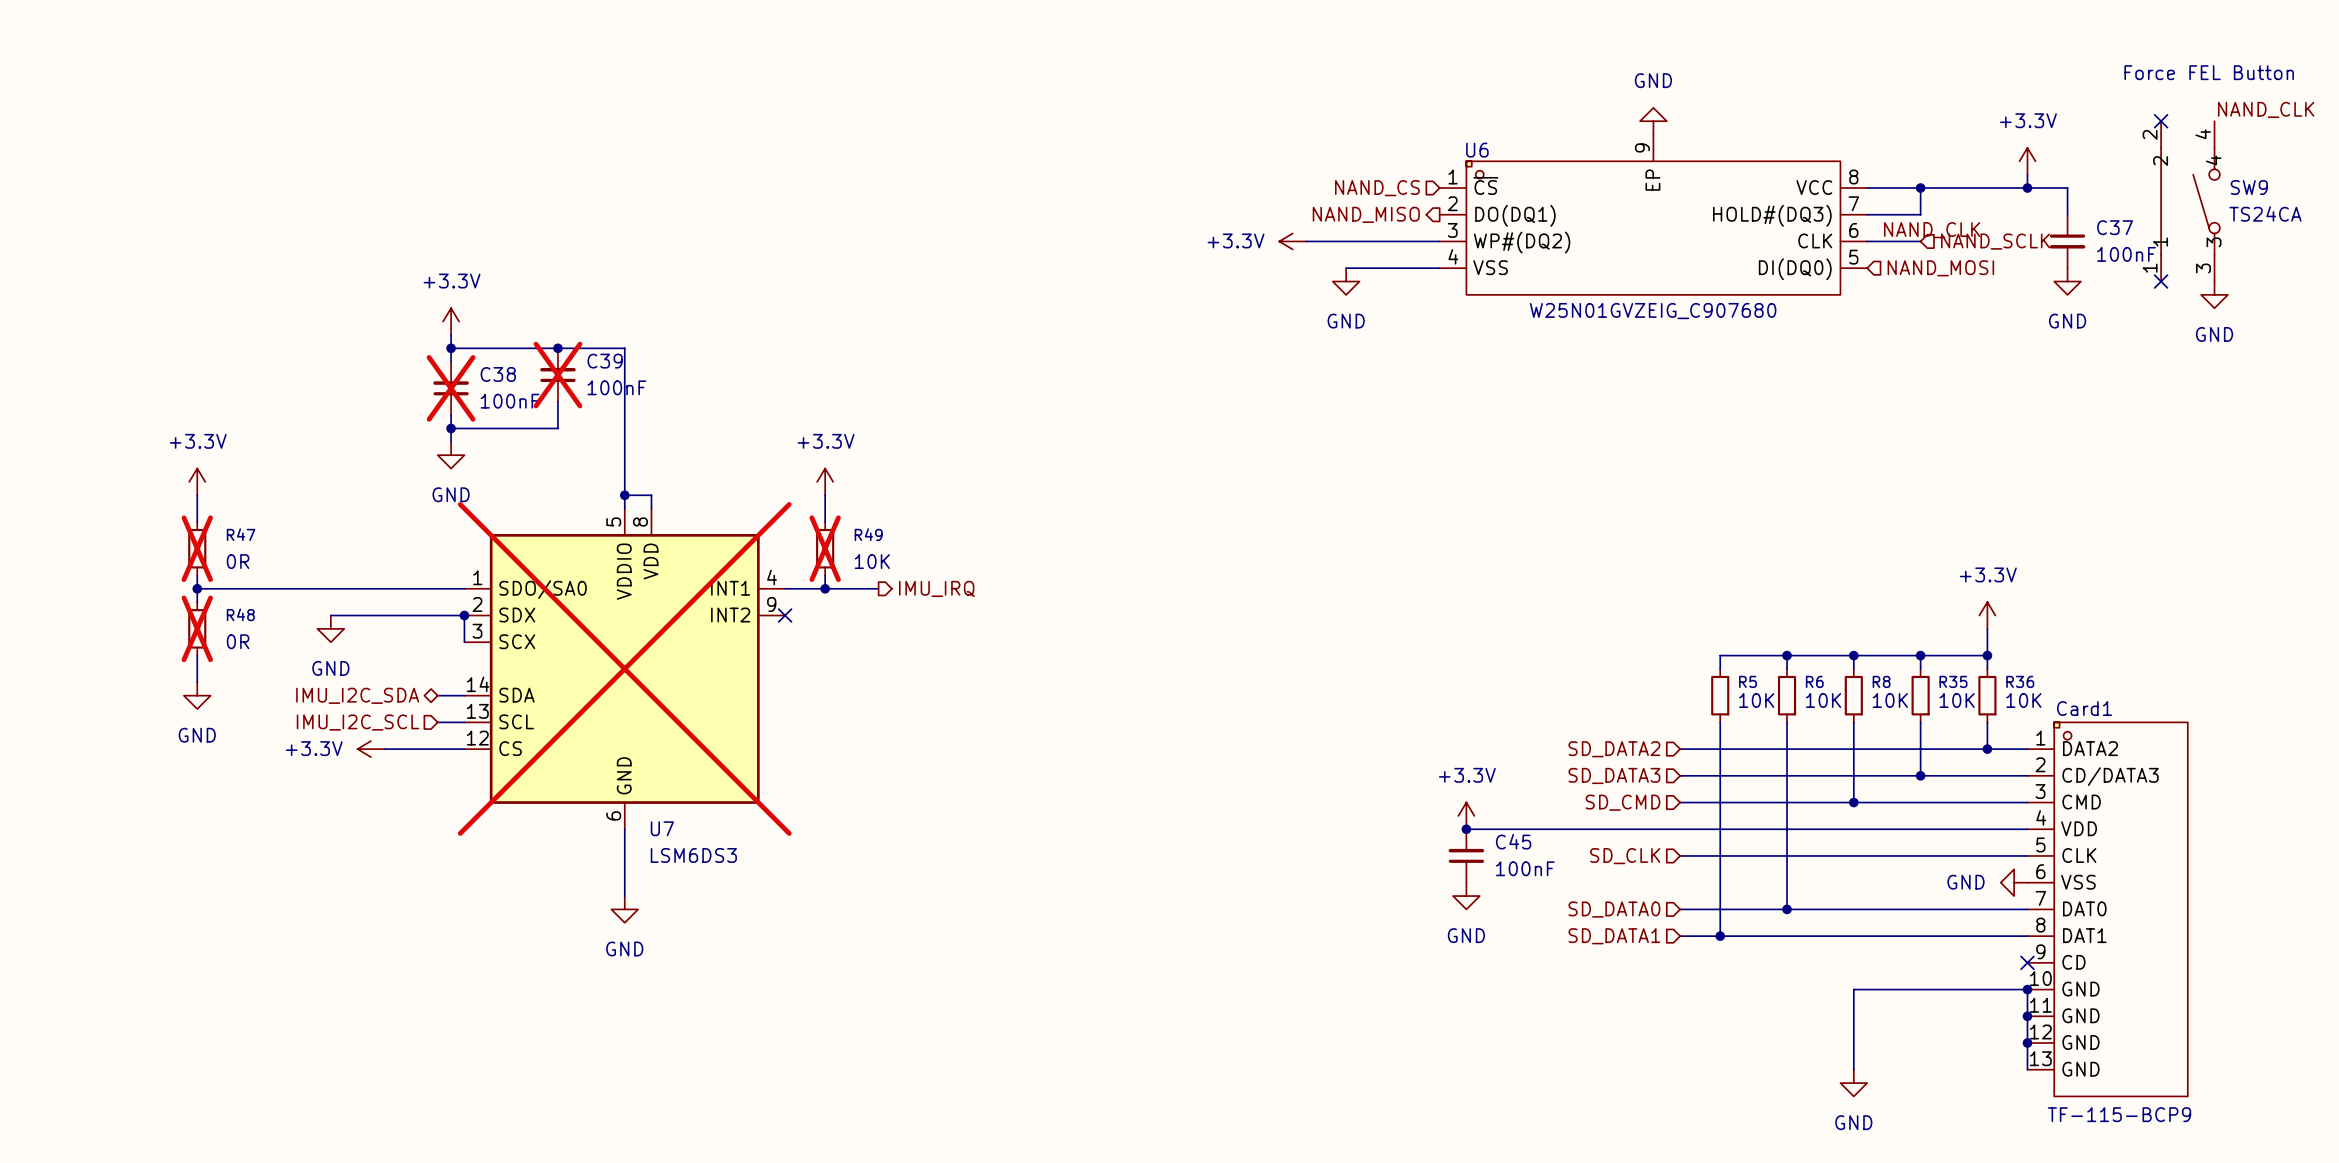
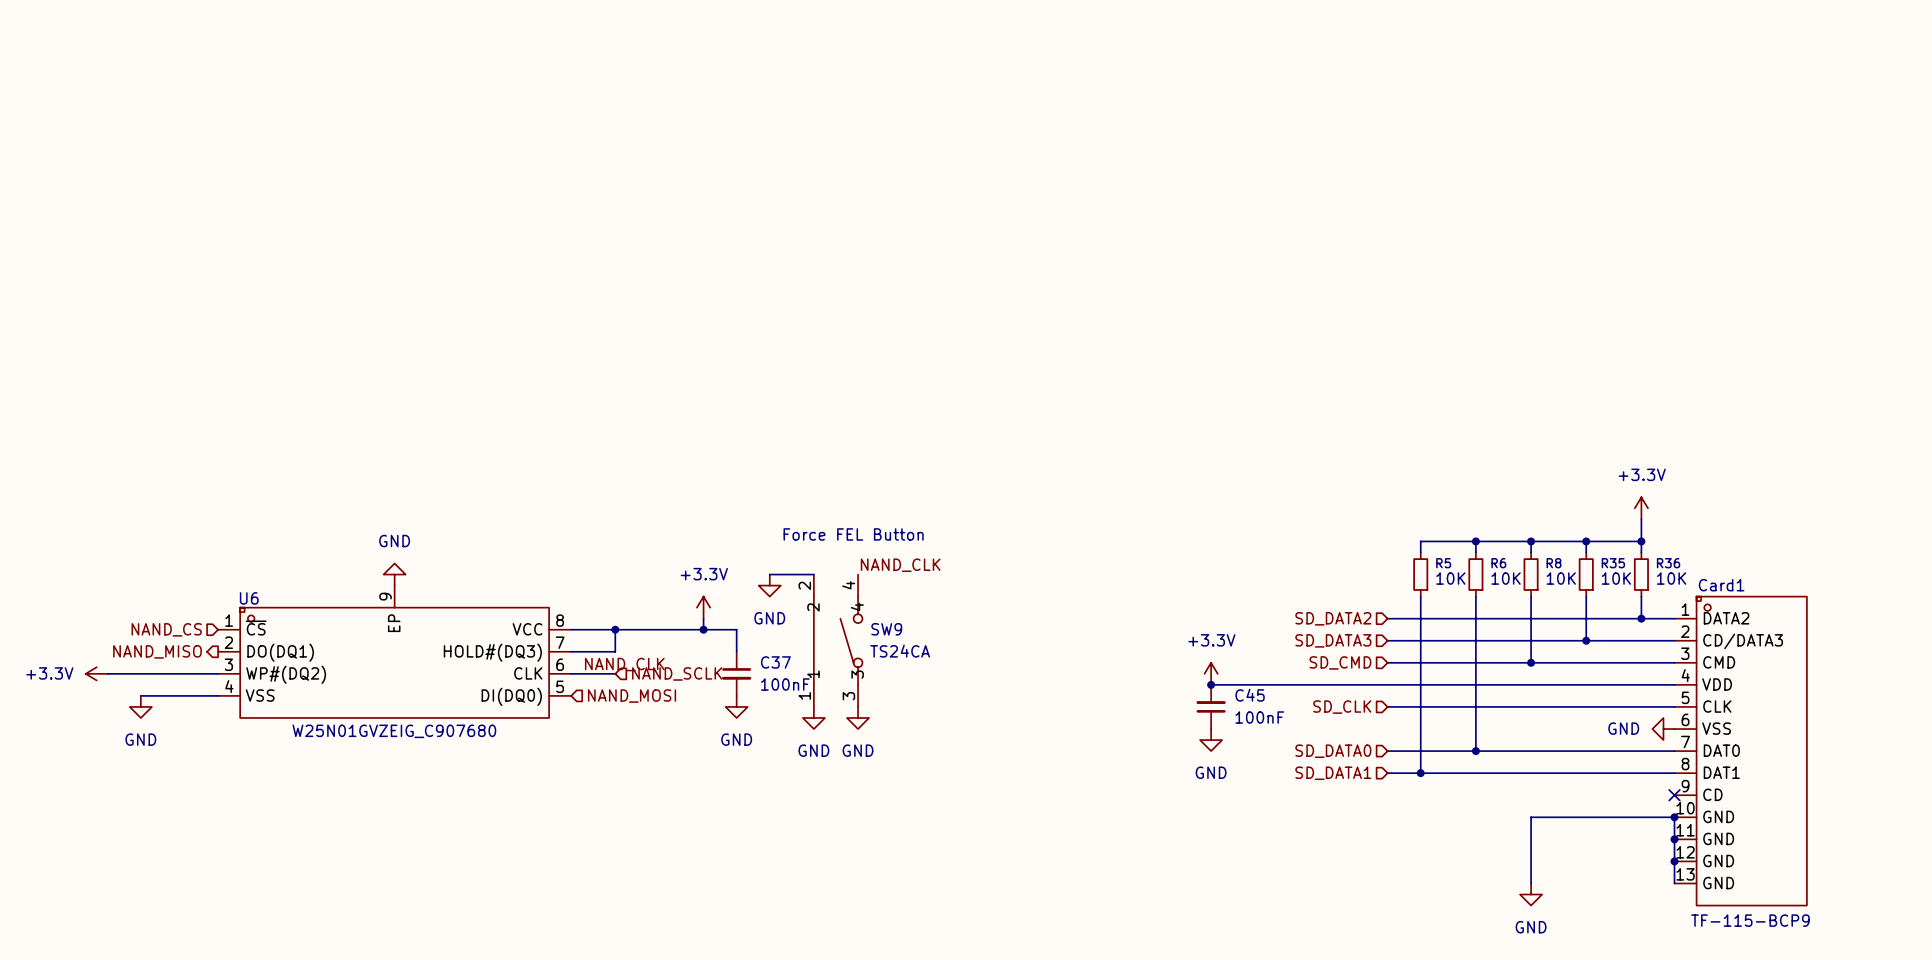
text: Force FEL Button (2209, 72) -> none
label: NAND_CLK (2266, 109) -> none
power symbol: GND (1653, 121) -> none
no-connect mark: (2161, 121) -> none
power symbol: +3.3V (2027, 161) -> none
wire: (2027, 174) (2027, 188) -> none
hierarchical label: NAND_CS (1377, 188) -> none
wire: (1867, 188) (2067, 188) (2067, 214) -> none
wire: (1920, 188) (1920, 214) (1867, 214) -> none
junction: (1920, 188) -> none
junction: (2027, 188) -> none
SW9 position: (2190, 201) -> (838, 640)
hierarchical label: NAND_MISO (1366, 214) -> none
U6 position: (1653, 214) -> (394, 651)
label: NAND_CLK (1932, 230) -> none
power symbol: +3.3V (1292, 241) -> none
wire: (1306, 241) (1439, 241) -> none
wire: (1867, 241) (1920, 241) -> none
hierarchical label: NAND_SCLK (1995, 241) -> none
C37 position: (2067, 241) -> (736, 673)
wire: (1346, 268) (1439, 268) -> none
hierarchical label: NAND_MOSI (1940, 268) -> none
power symbol: GND (1346, 281) -> none
power symbol: GND (2067, 281) -> none
no-connect mark: (2161, 281) -> none
power symbol: GND (2214, 294) -> none
power symbol: +3.3V (451, 321) -> none
wire: (451, 334) (451, 361) -> none
wire: (451, 348) (624, 348) (624, 508) -> none
junction: (451, 348) -> none
junction: (557, 348) -> none
C39: 100nF (557, 375) -> none
C38: 100nF (451, 388) -> none
wire: (557, 401) (557, 428) (451, 428) -> none
wire: (451, 415) (451, 441) -> none
junction: (451, 428) -> none
power symbol: GND (451, 455) -> none
power symbol: +3.3V (197, 481) -> none
power symbol: +3.3V (825, 481) -> none
wire: (197, 495) (197, 521) -> none
wire: (624, 495) (651, 495) (651, 508) -> none
junction: (624, 495) -> none
wire: (825, 495) (825, 521) -> none
R47: 0R (197, 548) -> none
R49: 10K (825, 548) -> none
wire: (197, 575) (197, 602) -> none
wire: (825, 575) (825, 588) -> (703, 618) (703, 629)
wire: (197, 588) (464, 588) -> none
junction: (197, 588) -> none
wire: (785, 588) (878, 588) -> none
junction: (825, 588) -> none
hierarchical label: IMU_IRQ (937, 588) -> none
wire: (330, 615) (464, 615) (464, 642) -> none
junction: (464, 615) -> none
no-connect mark: (785, 615) -> none
R48: 0R (197, 628) -> none
power symbol: GND (330, 628) -> none
text: none -> Force FEL Button (853, 534)
wire: (197, 655) (197, 682) -> none
U7: LSM6DS3 (624, 668) -> none
label: none -> NAND_CLK (900, 565)
power symbol: GND (197, 695) -> none
hierarchical label: IMU_I2C_SDA (357, 695) -> none
wire: (437, 695) (464, 695) -> none
power symbol: none -> GND (394, 574)
wire: none -> (769, 574) (813, 574)
power symbol: none -> GND (769, 585)
hierarchical label: IMU_I2C_SCL (358, 722) -> none
wire: (437, 722) (464, 722) -> none
power symbol: none -> +3.3V (703, 607)
power symbol: +3.3V (370, 749) -> none
wire: (384, 749) (464, 749) -> none
hierarchical label: none -> NAND_CS (166, 629)
wire: none -> (571, 629) (736, 629) (736, 651)
junction: none -> (615, 629)
junction: none -> (703, 629)
hierarchical label: none -> NAND_MISO (157, 651)
label: none -> NAND_CLK (624, 664)
power symbol: none -> +3.3V (96, 673)
wire: none -> (107, 673) (218, 673)
wire: none -> (571, 673) (615, 673)
hierarchical label: none -> NAND_SCLK (677, 673)
wire: (624, 829) (624, 896) -> none
wire: none -> (140, 695) (218, 695)
hierarchical label: none -> NAND_MOSI (632, 696)
power symbol: none -> GND (140, 706)
power symbol: none -> GND (736, 706)
power symbol: none -> GND (813, 717)
power symbol: none -> GND (858, 717)
power symbol: GND (624, 909) -> none

